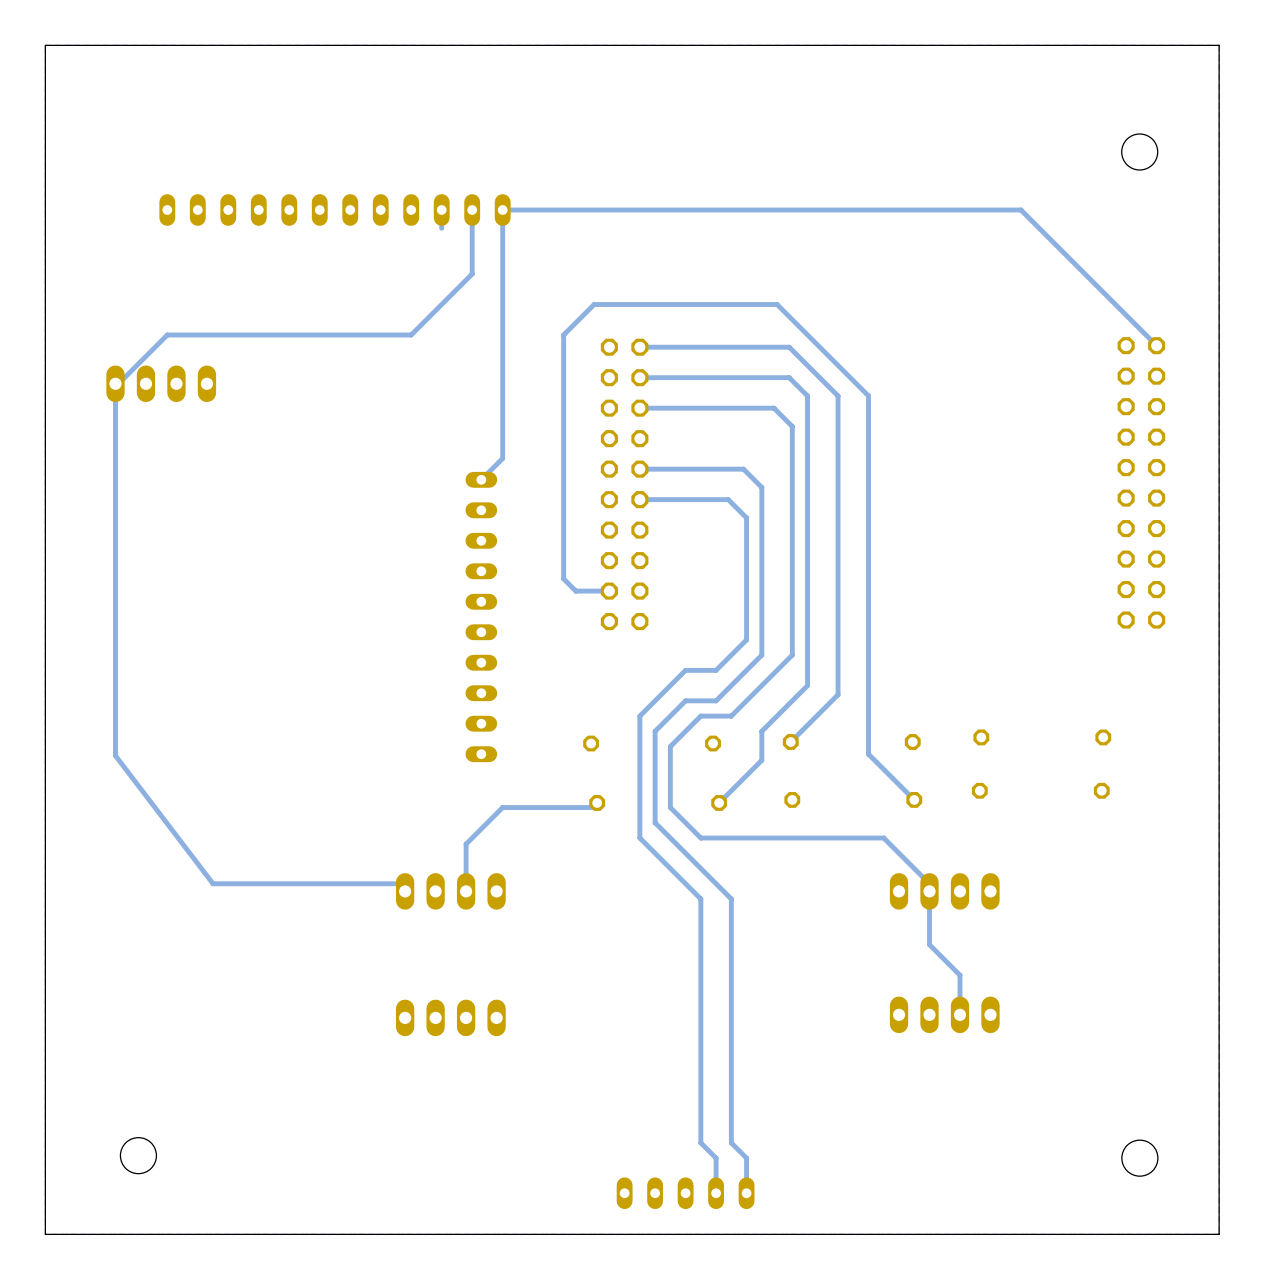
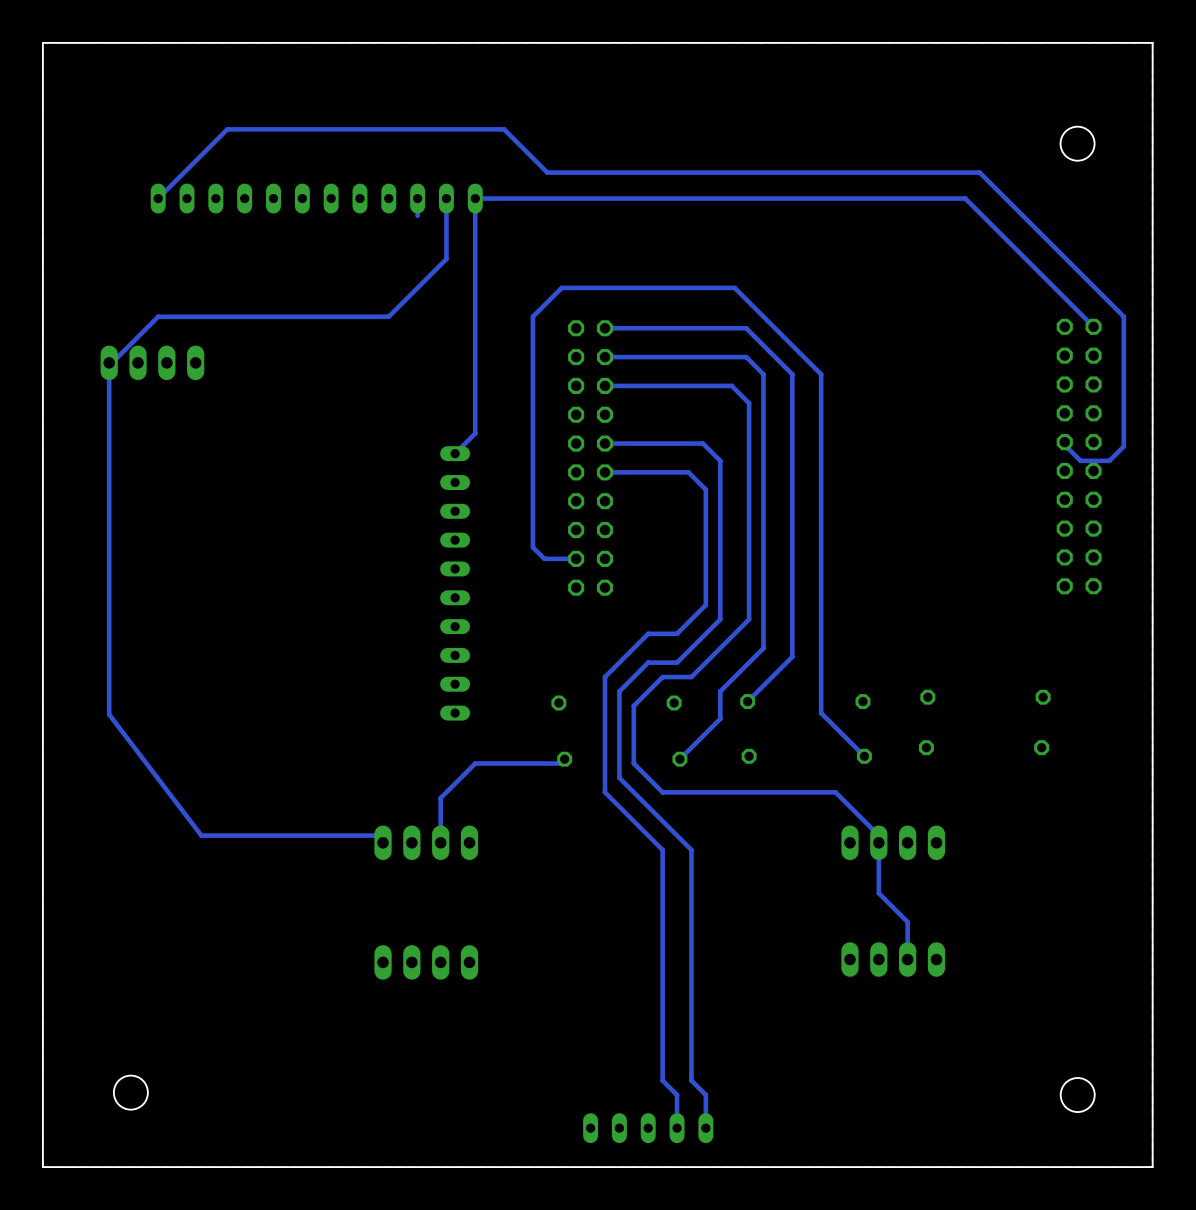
track: none -> (158, 198) (227, 129) (504, 129) (547, 172) (979, 172) (1123, 316) (1123, 446) (1109, 460) (1080, 460) (1064, 445) (1064, 442)

